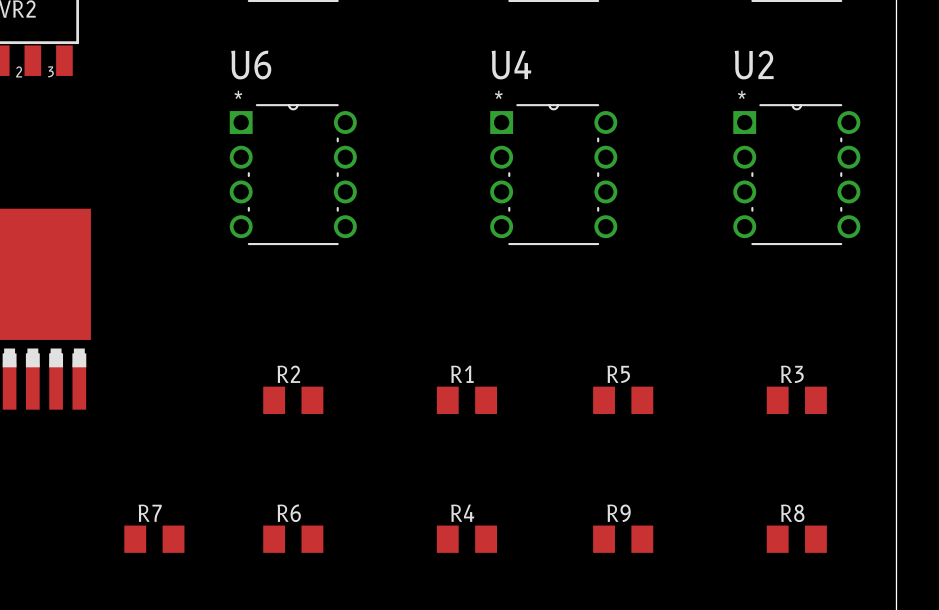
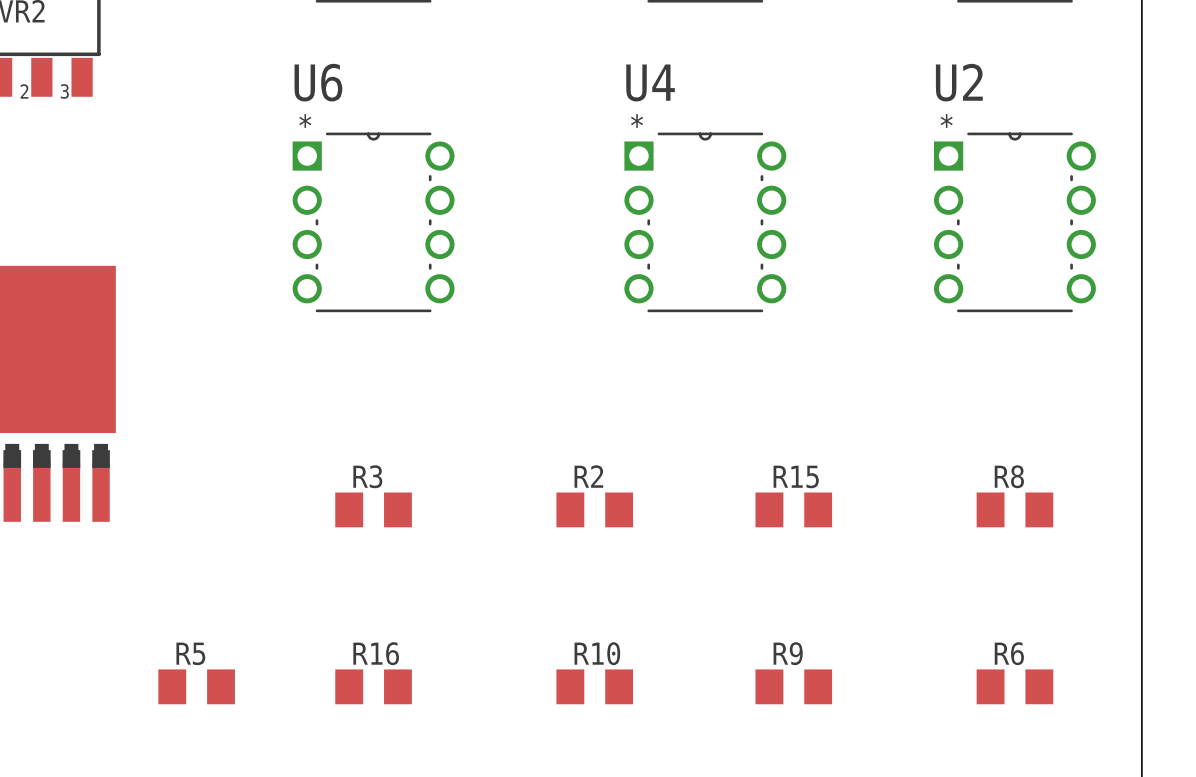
R2 name: R2 (288, 374) -> R3 (367, 476)
R1 name: R1 (462, 374) -> R2 (588, 476)
R5 name: R5 (618, 374) -> R15 (796, 476)
R3 name: R3 (792, 374) -> R8 (1009, 476)
R7 name: R7 (150, 513) -> R5 (190, 653)
R6 name: R6 (289, 513) -> R16 (376, 653)
R4 name: R4 (462, 513) -> R10 (597, 653)
R8 name: R8 (792, 513) -> R6 (1009, 653)

